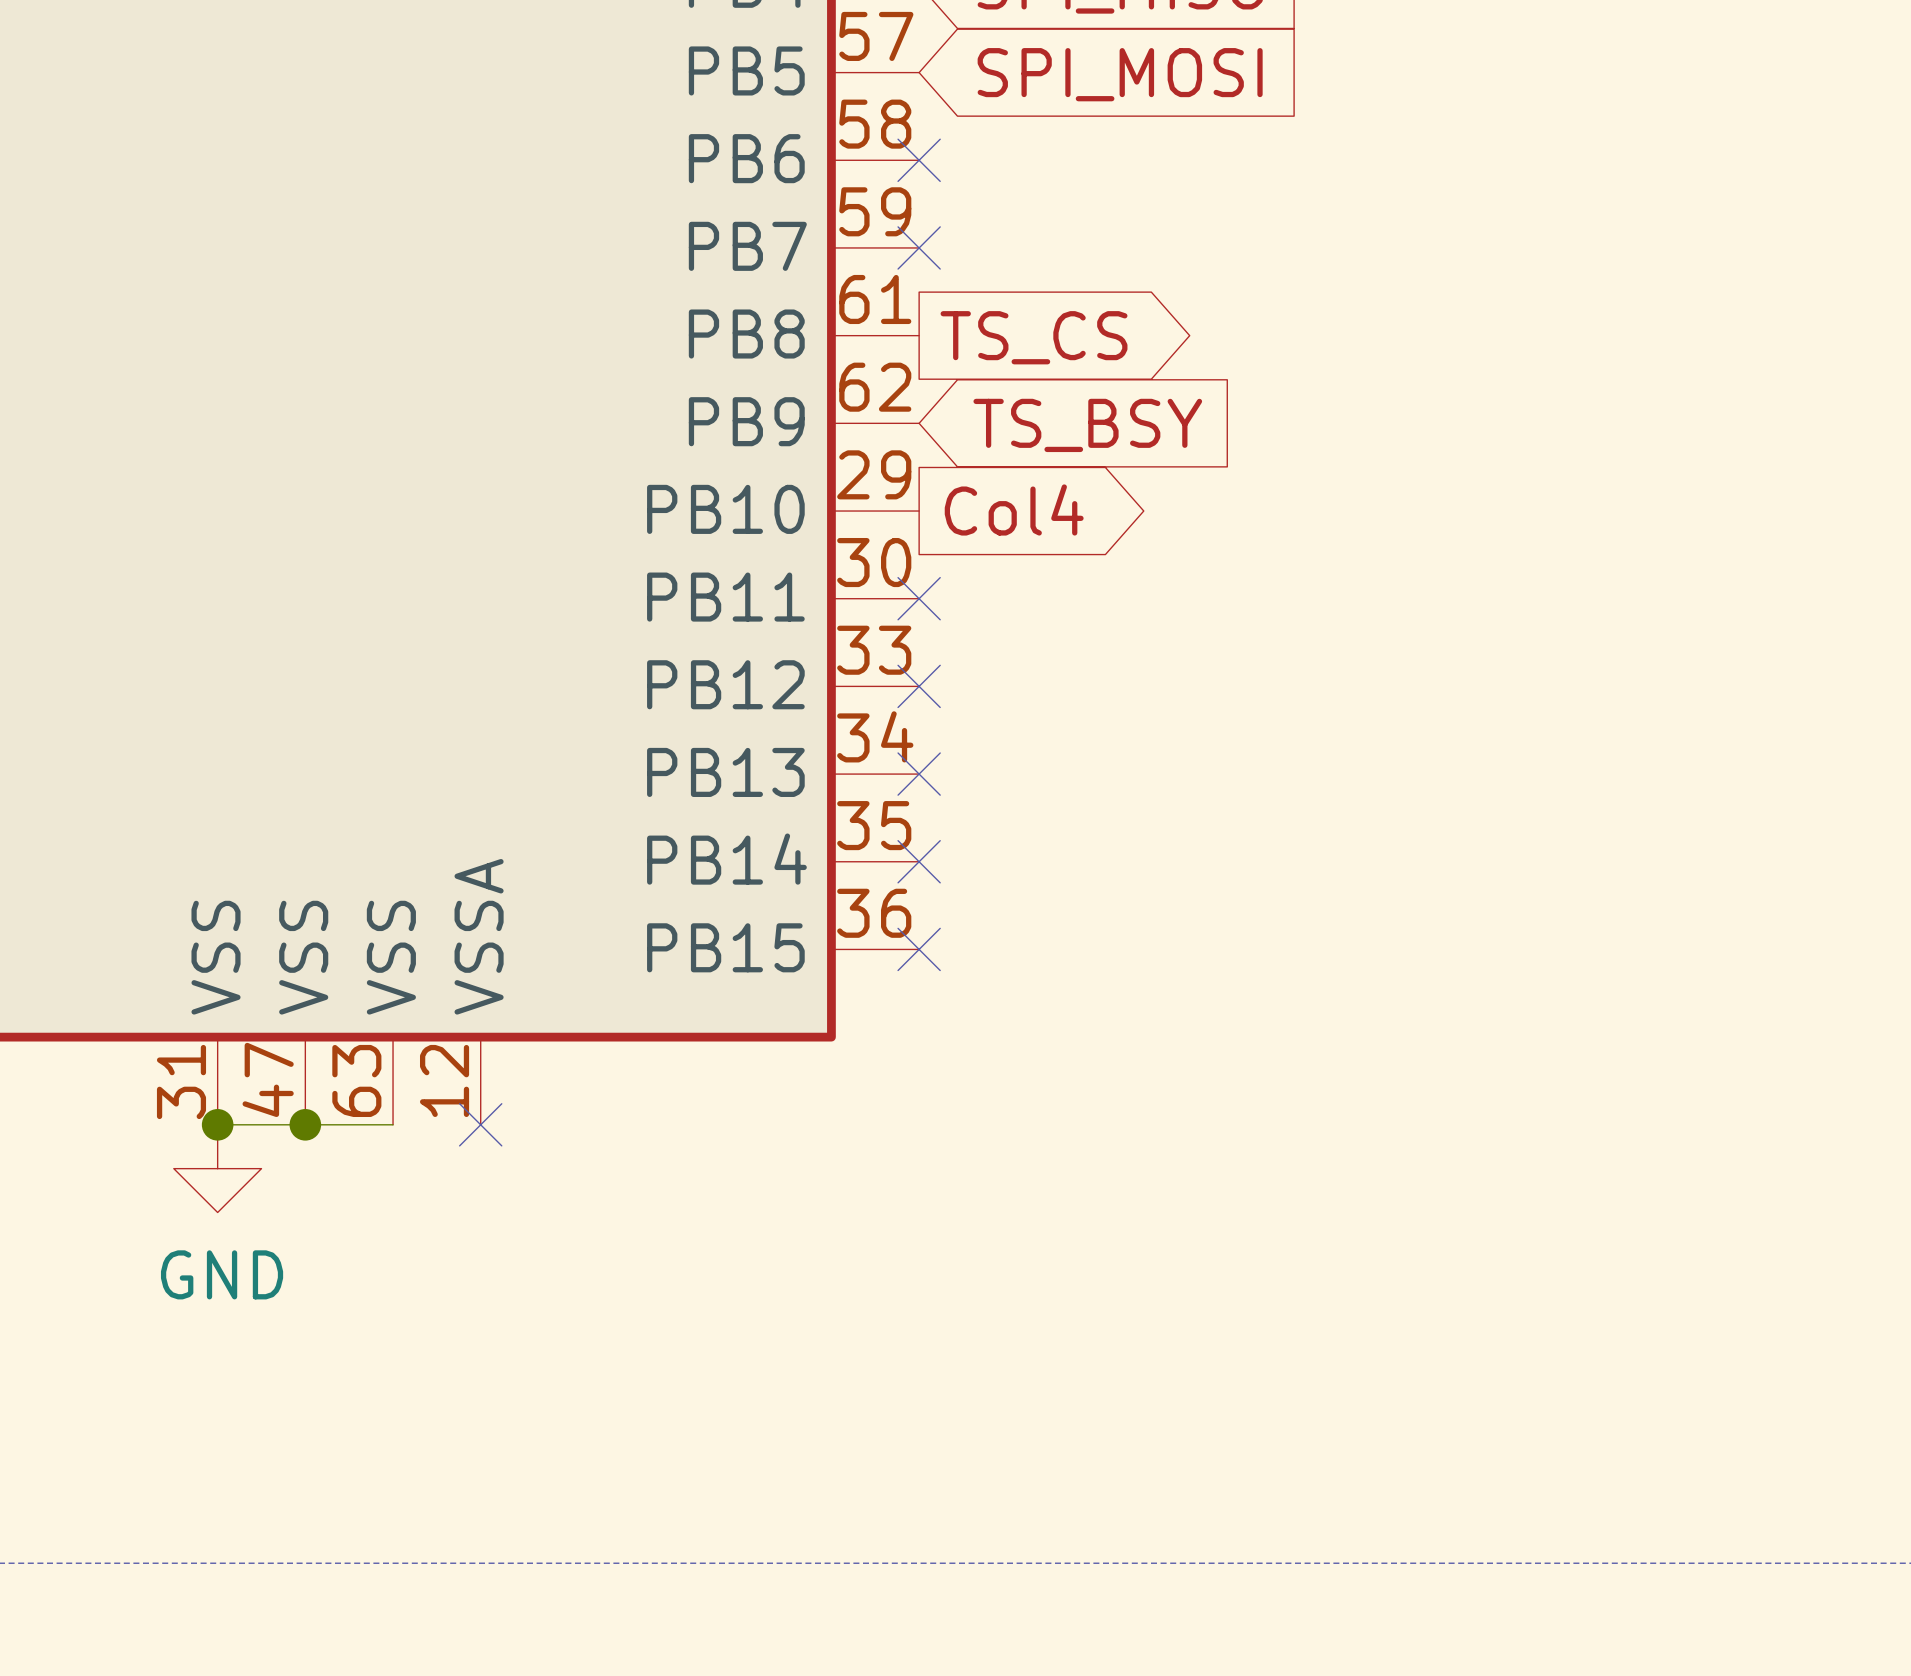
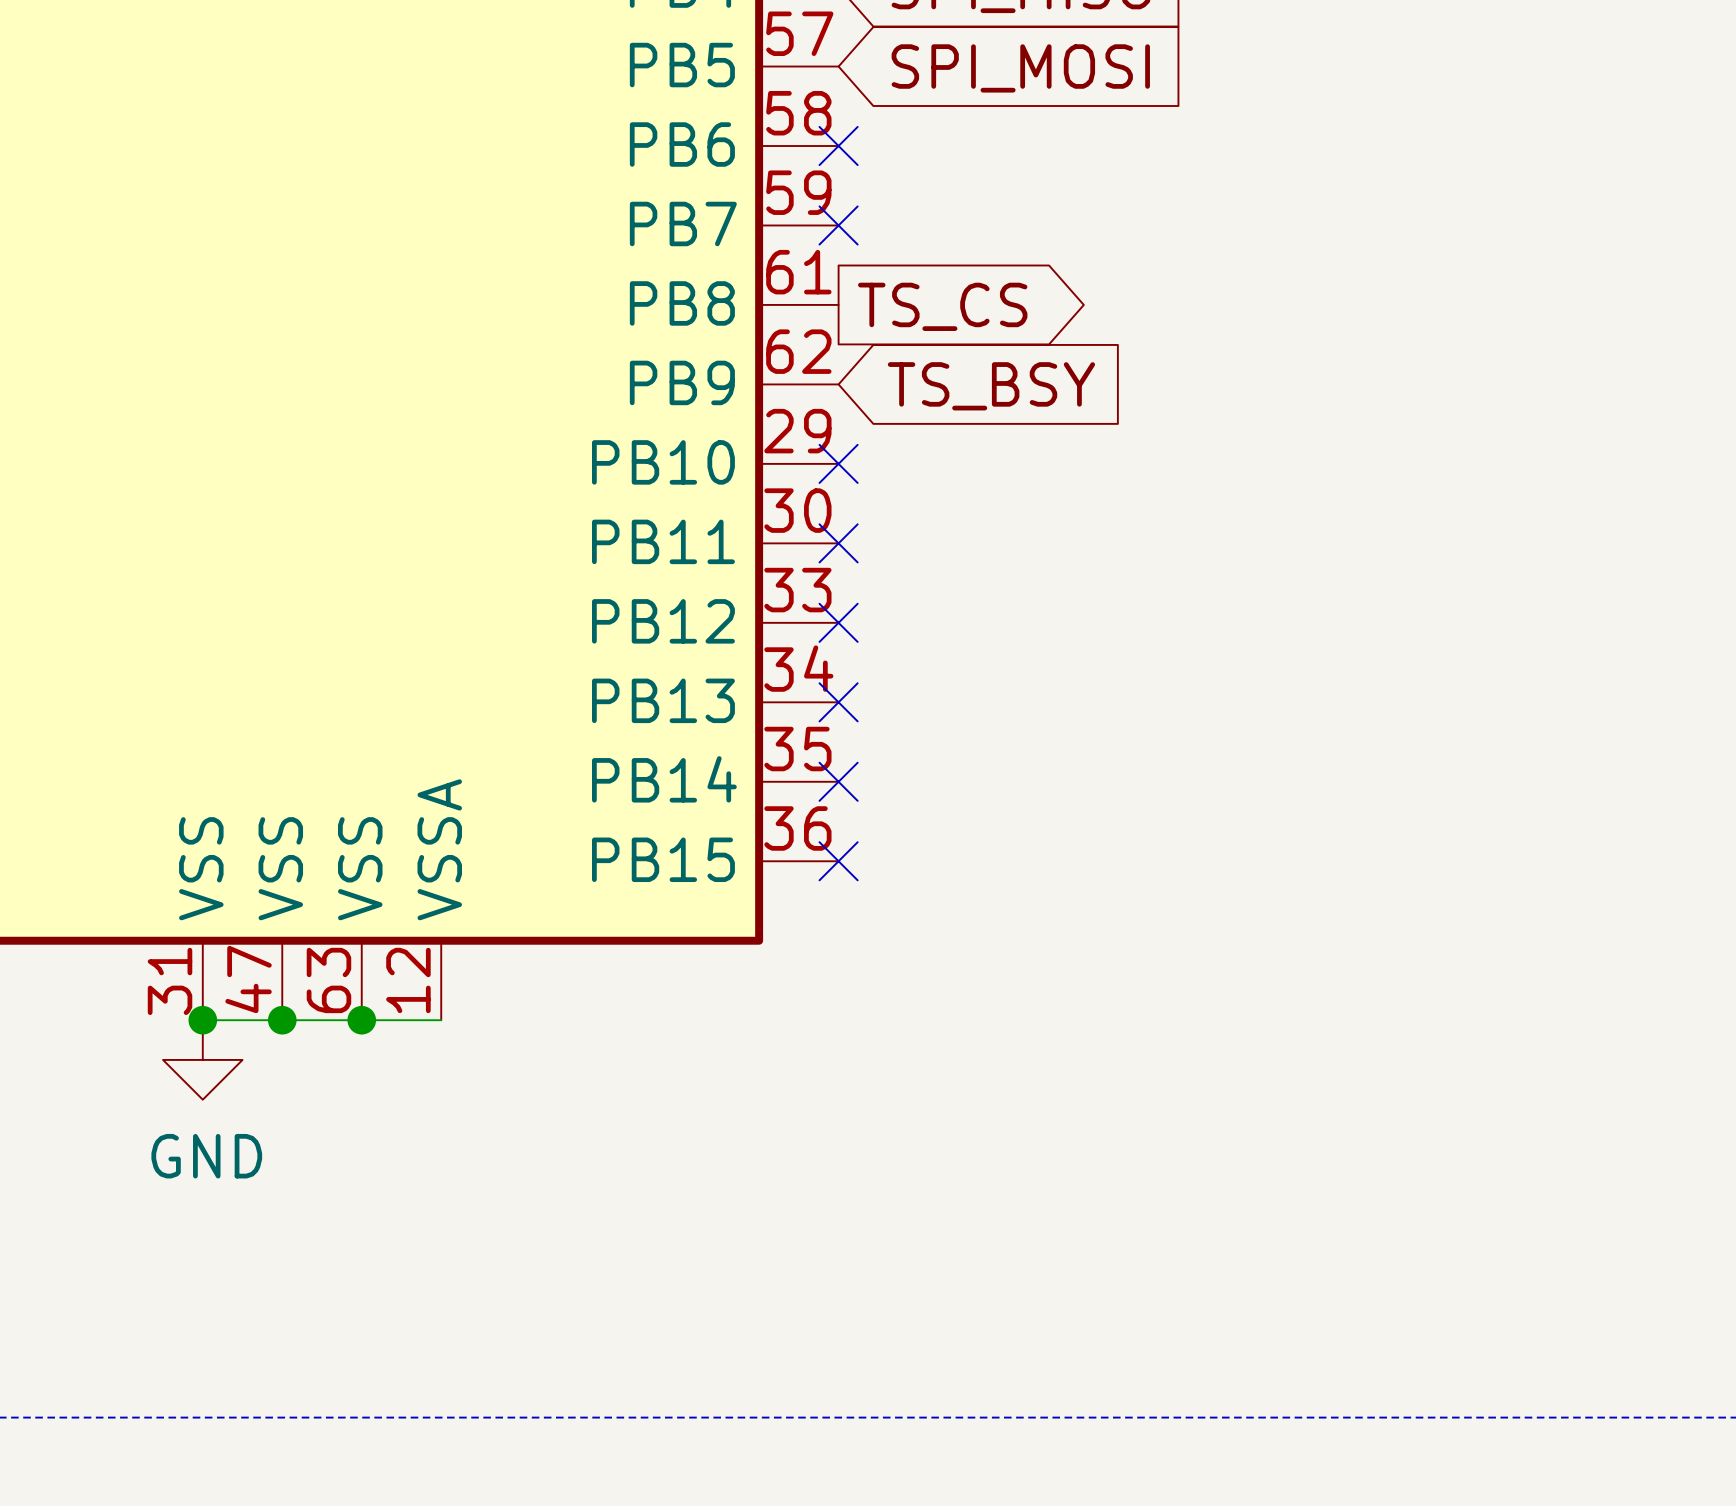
global label: Col4 (1014, 509) -> none
no-connect mark: none -> (838, 463)
wire: none -> (361, 1020) (441, 1020)
junction: none -> (361, 1020)
no-connect mark: (480, 1124) -> none

